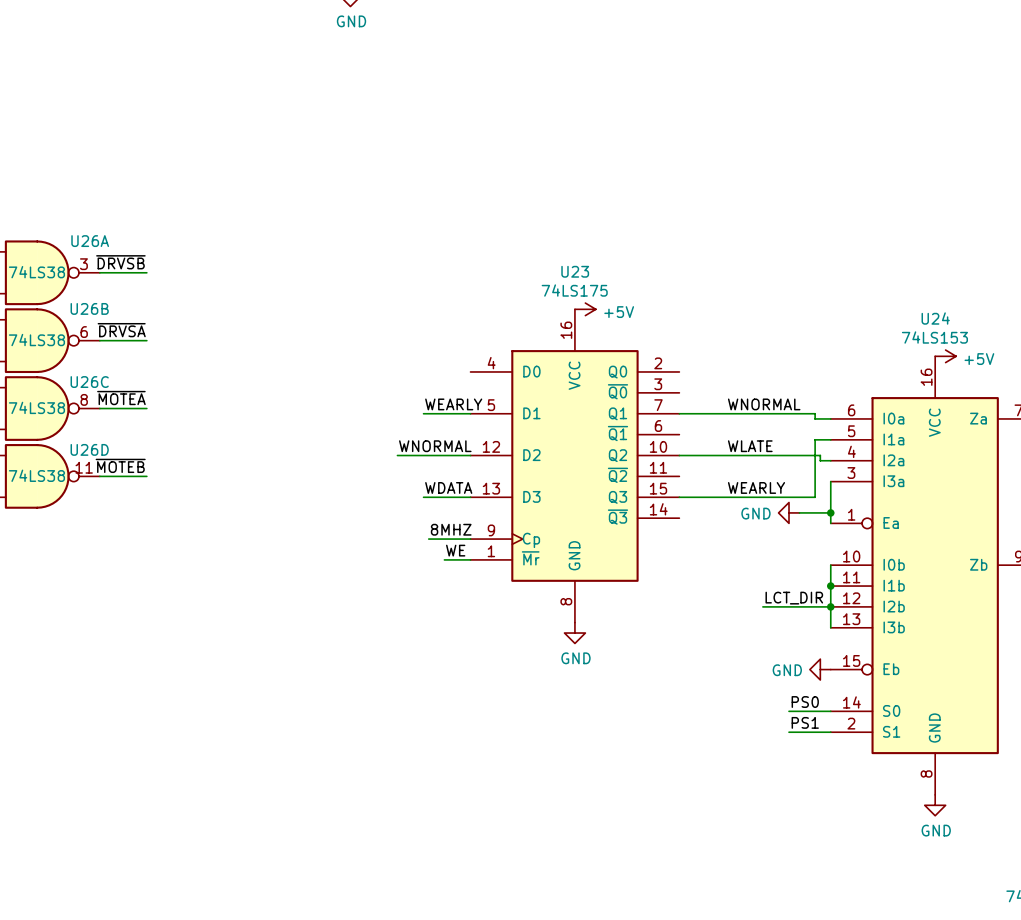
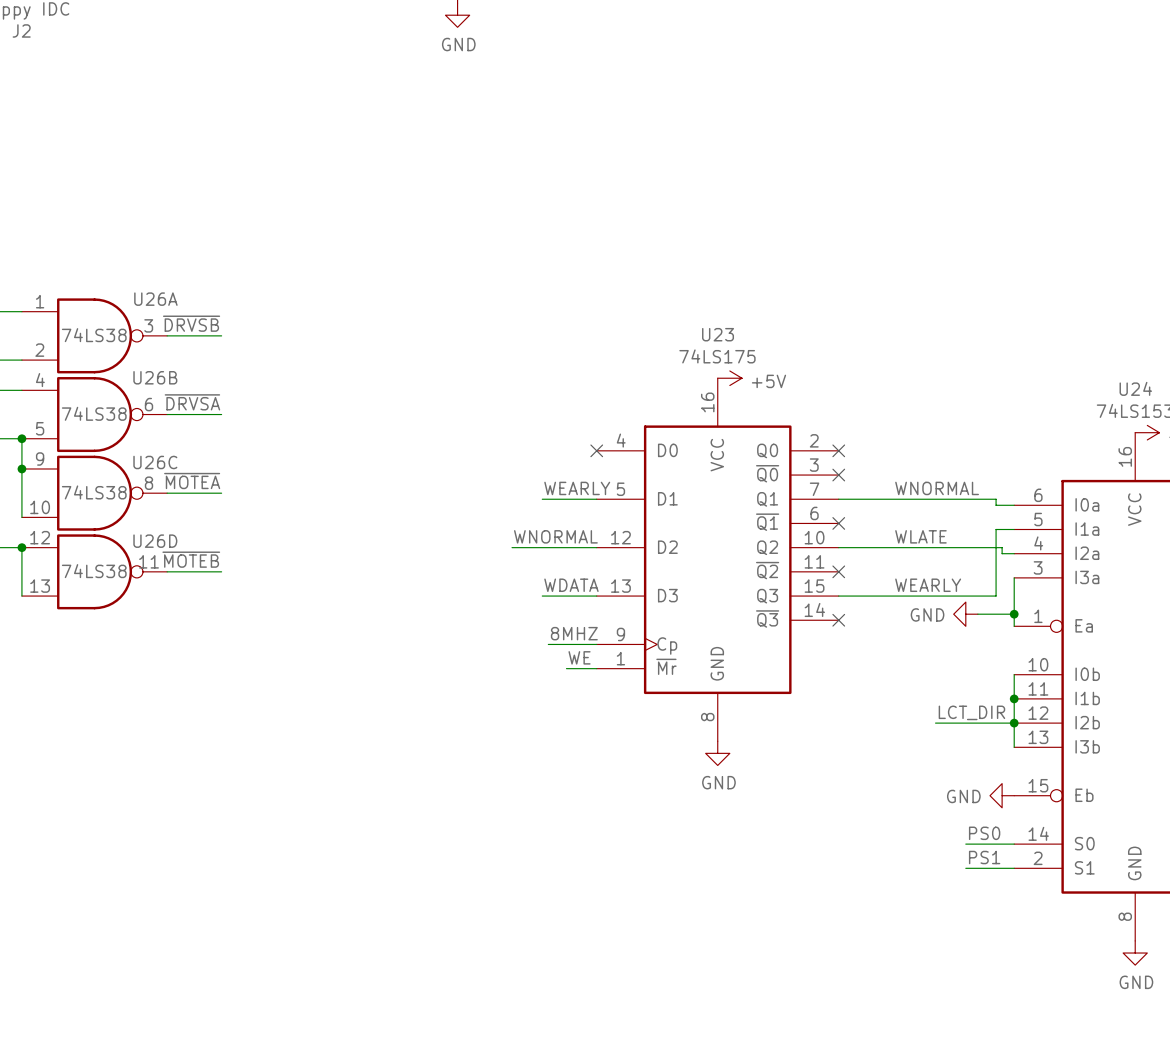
no-connect mark: none -> (596, 450)
no-connect mark: none -> (838, 450)
no-connect mark: none -> (838, 475)
no-connect mark: none -> (838, 523)
no-connect mark: none -> (838, 571)
no-connect mark: none -> (838, 620)

